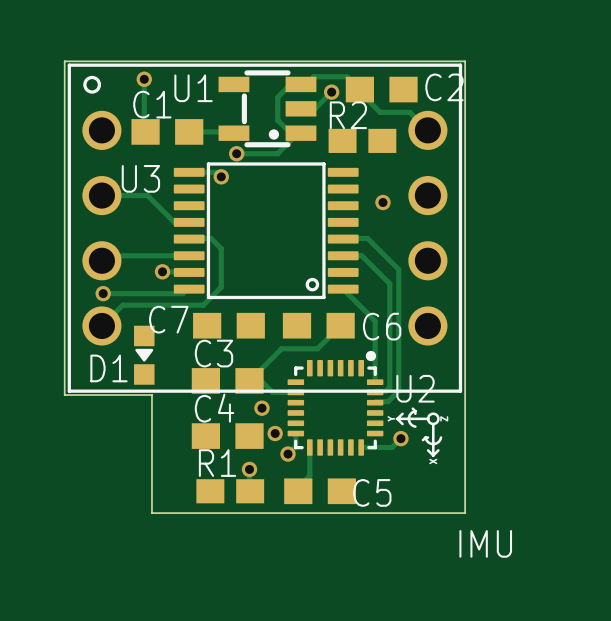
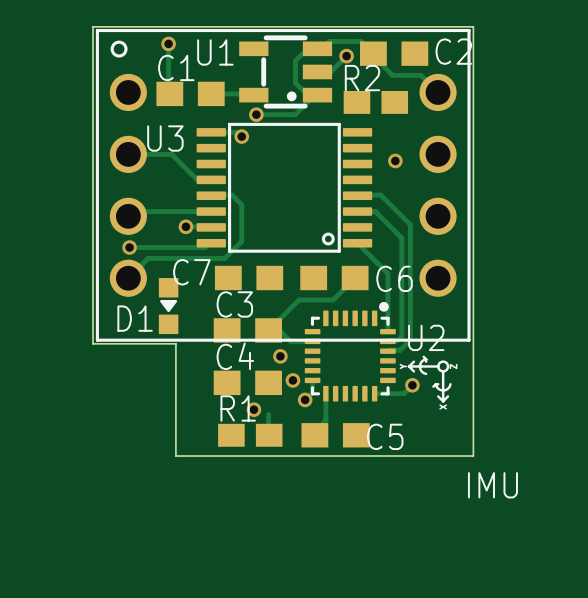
via position: (249, 469) -> (253, 409)

